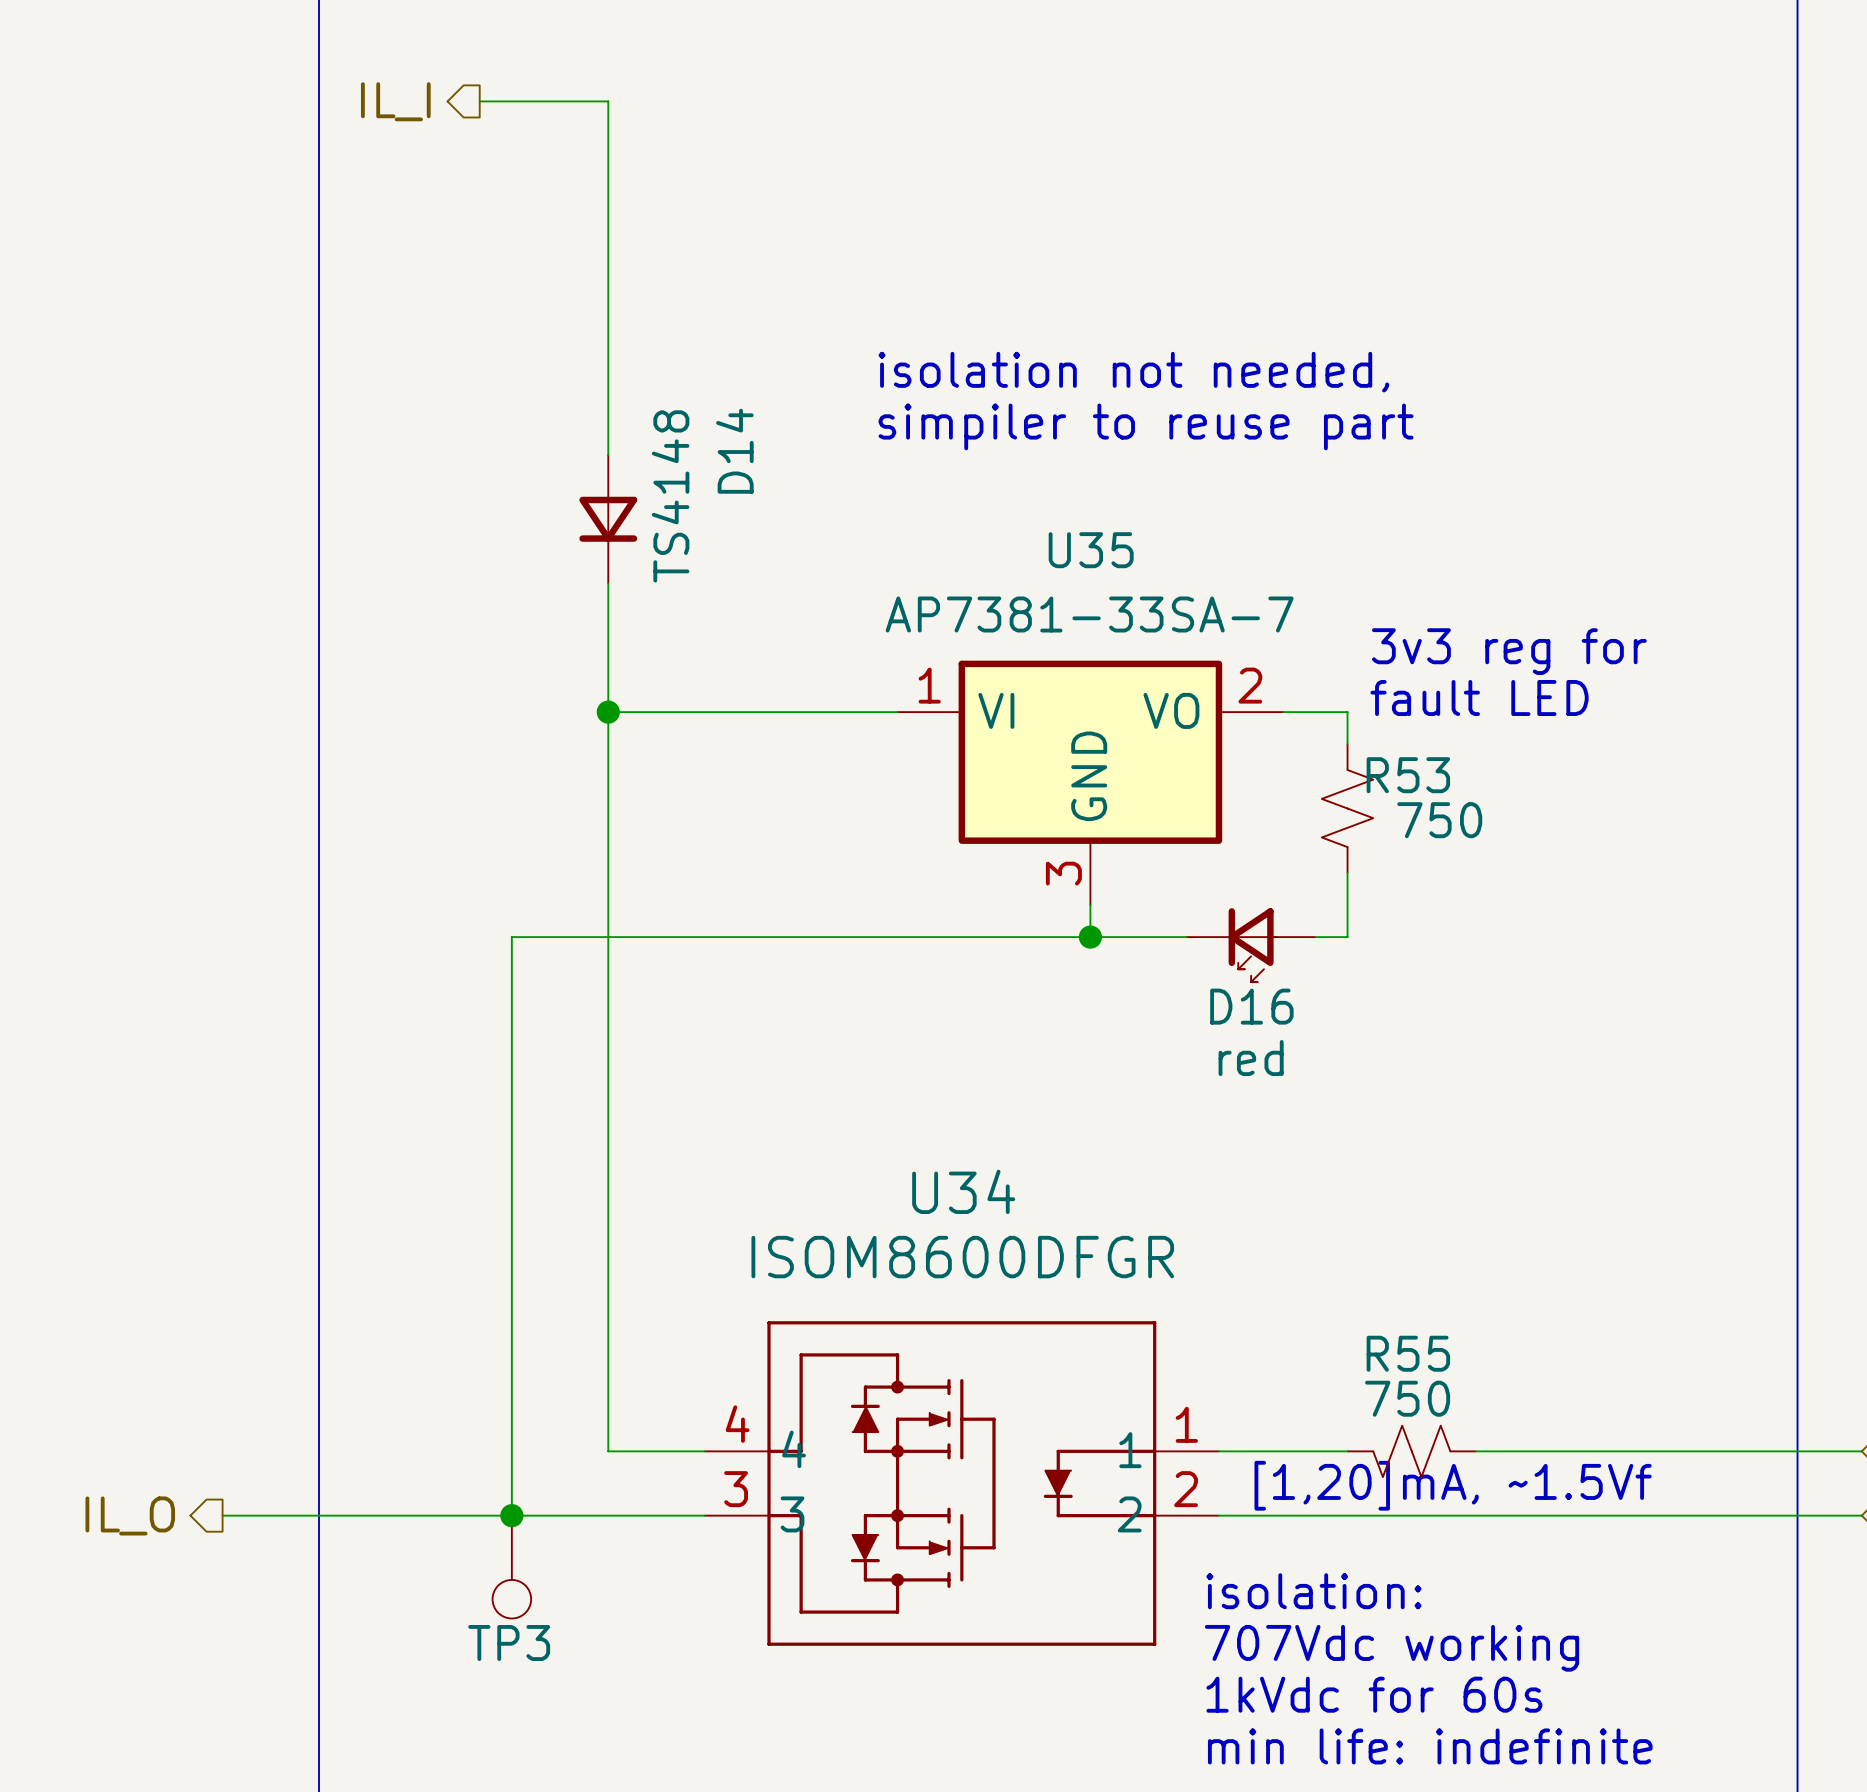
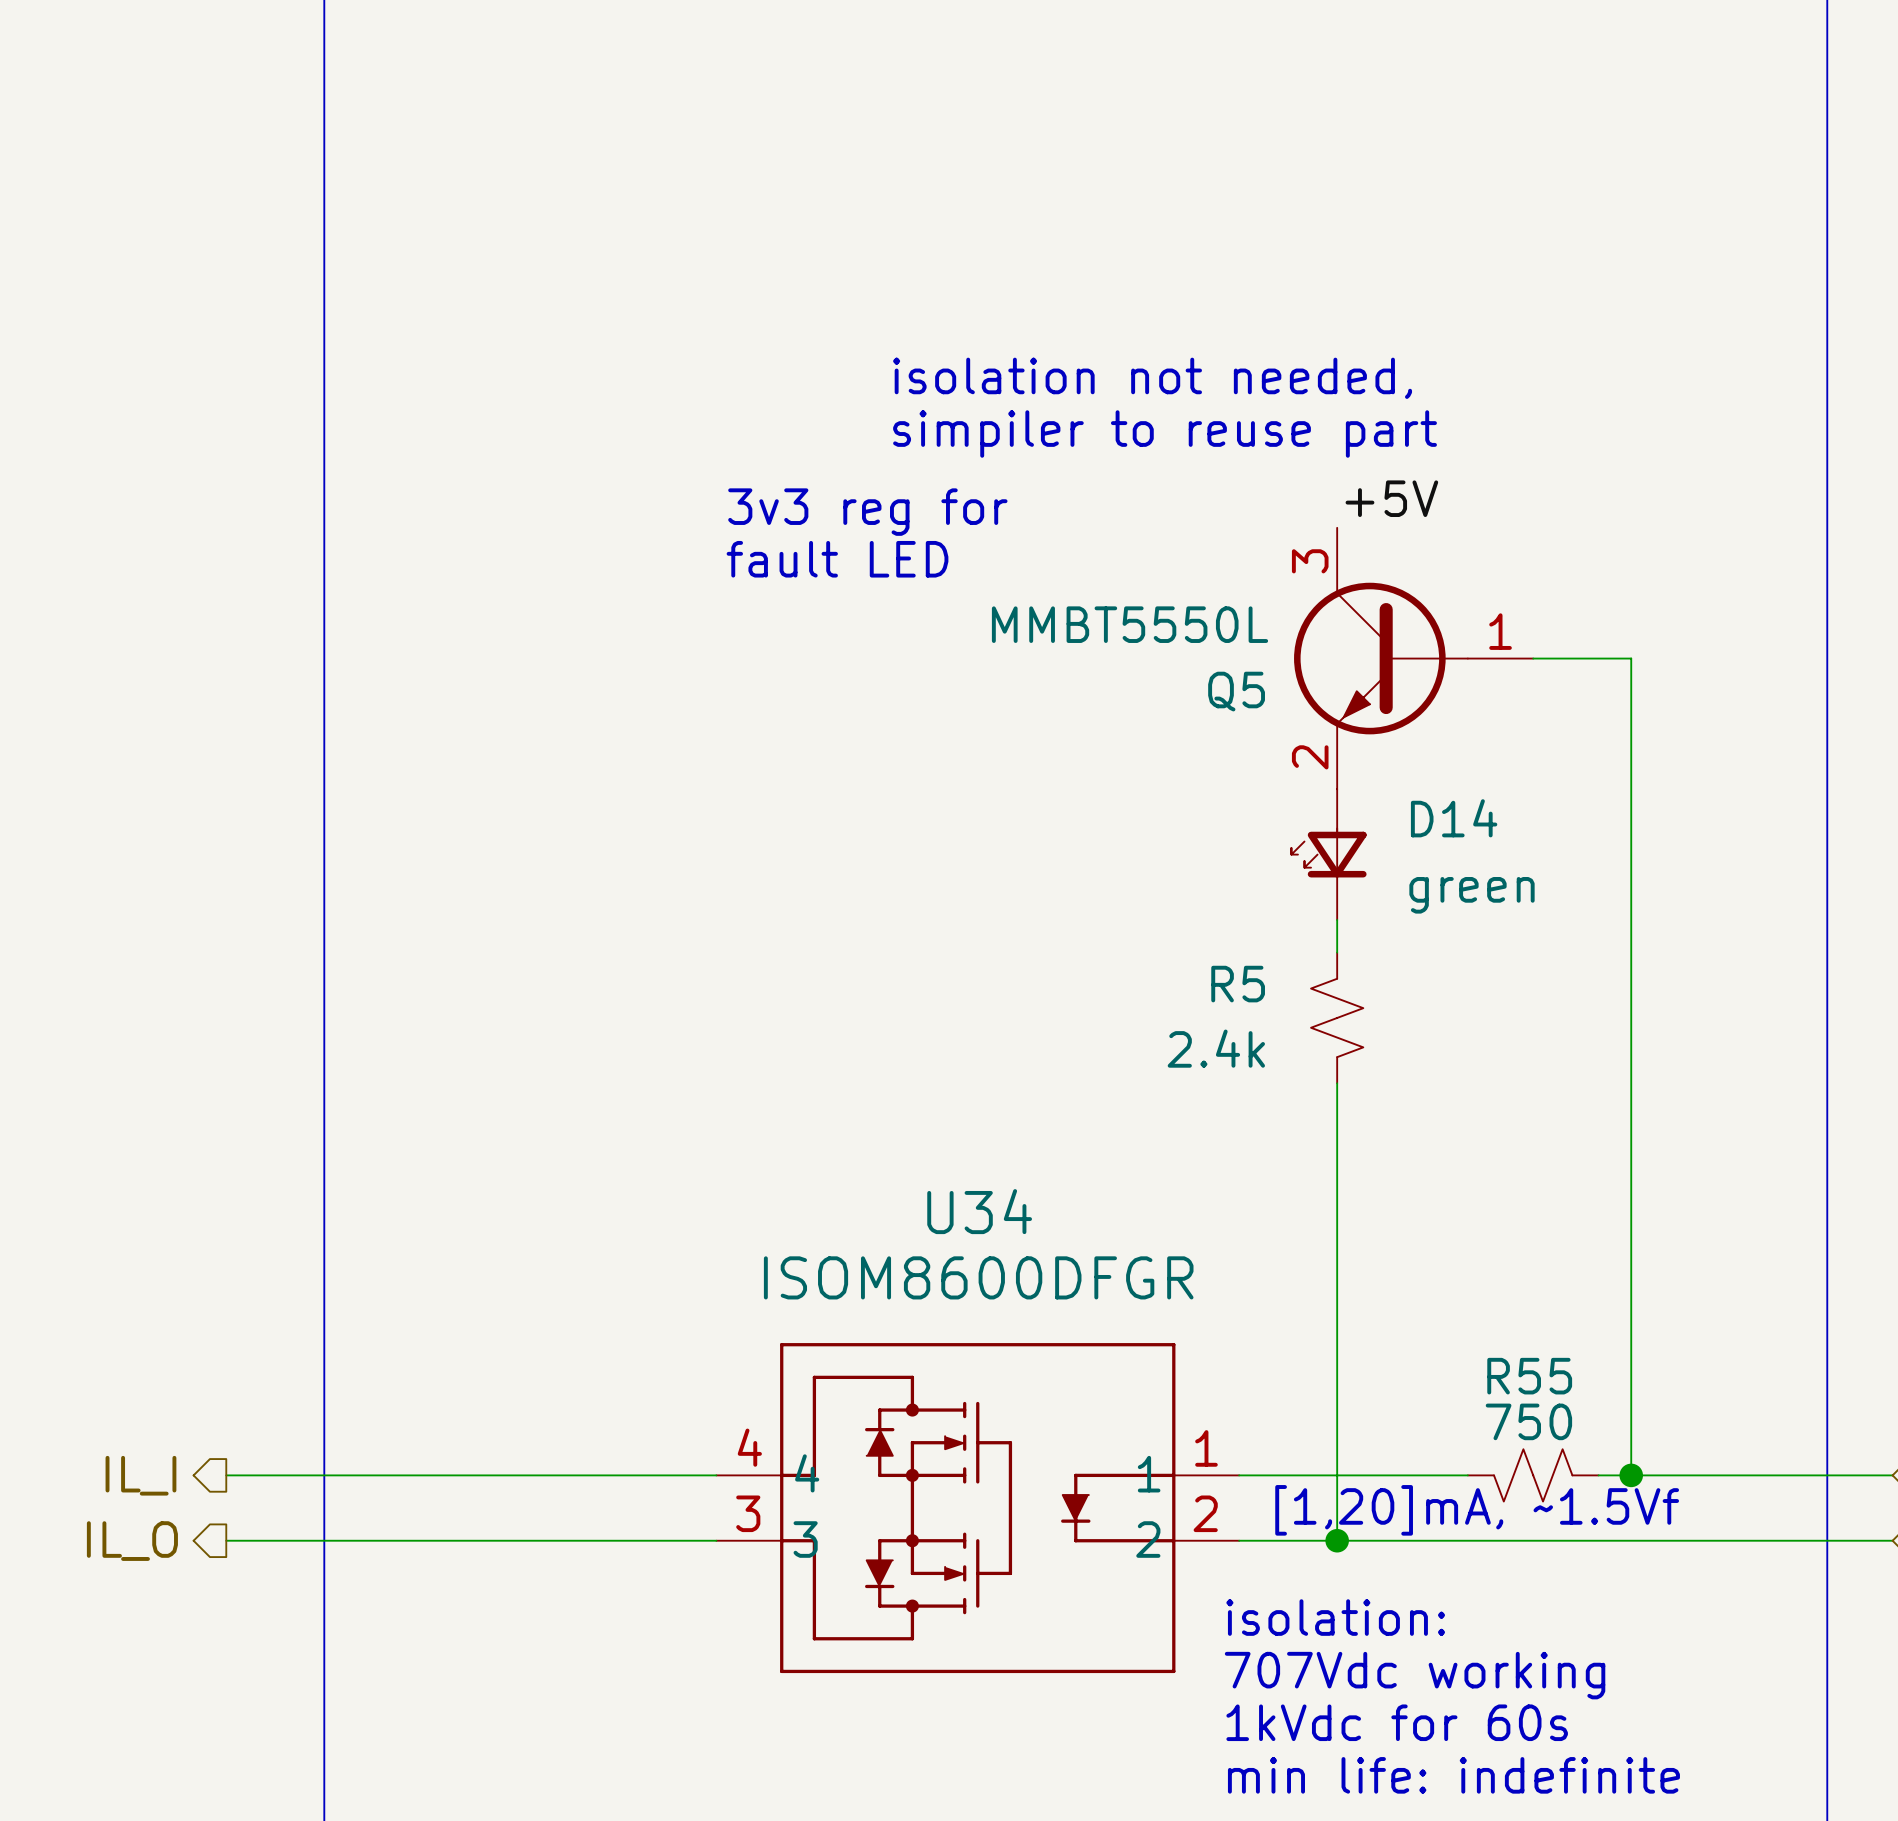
hierarchical label: IL_I (395, 101) -> none
wire: (479, 101) (608, 101) (608, 454) -> none
D14 symbol: [579, 454, 638, 584] -> [1291, 789, 1367, 920]
label: none -> +5V (1391, 498)
D14 value: TS4148 (670, 496) -> green (1472, 895)
text: none -> 3v3 reg for (867, 512)
text: none -> fault LED (837, 559)
wire: (608, 583) (608, 1451) -> (226, 1475) (618, 1475)
Q5: none -> MMBT5550L (1413, 658)
wire: none -> (1533, 658) (1631, 658) (1631, 1475)
text: 3v3 reg for (1509, 651) -> none
text: fault LED (1479, 697) -> none
wire: (608, 712) (897, 712) -> none
junction: (608, 712) -> none
wire: (1283, 712) (1347, 712) (1347, 744) -> none
U35: AP7381-33SA-7 (1090, 782) -> none
R53: 750 (1347, 808) -> none
wire: (1347, 872) (1347, 937) (1315, 937) -> (1337, 919) (1337, 952)
wire: (1090, 904) (1090, 937) -> none
junction: (1090, 937) -> none
wire: (1186, 937) (511, 937) (511, 1515) -> none
D16: red (1251, 945) -> none
R5: none -> 2.4k (1337, 1017)
wire: none -> (1337, 1083) (1337, 1540)
hierarchical label: none -> IL_I (140, 1475)
R55 position: (1411, 1451) -> (1533, 1475)
wire: (1476, 1451) (1572, 1451) -> (1369, 1475) (1467, 1475)
junction: none -> (1631, 1475)
junction: (511, 1515) -> none
junction: none -> (1337, 1540)
TP3: (511, 1567) -> none

